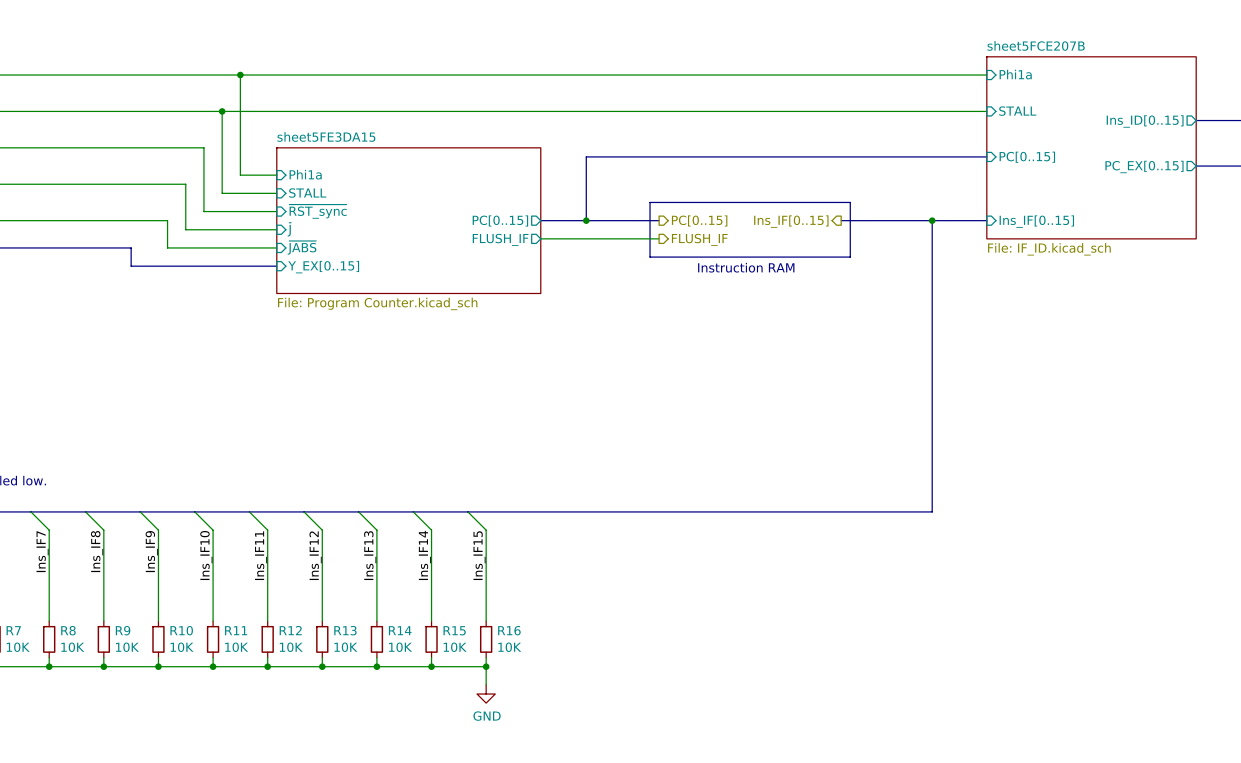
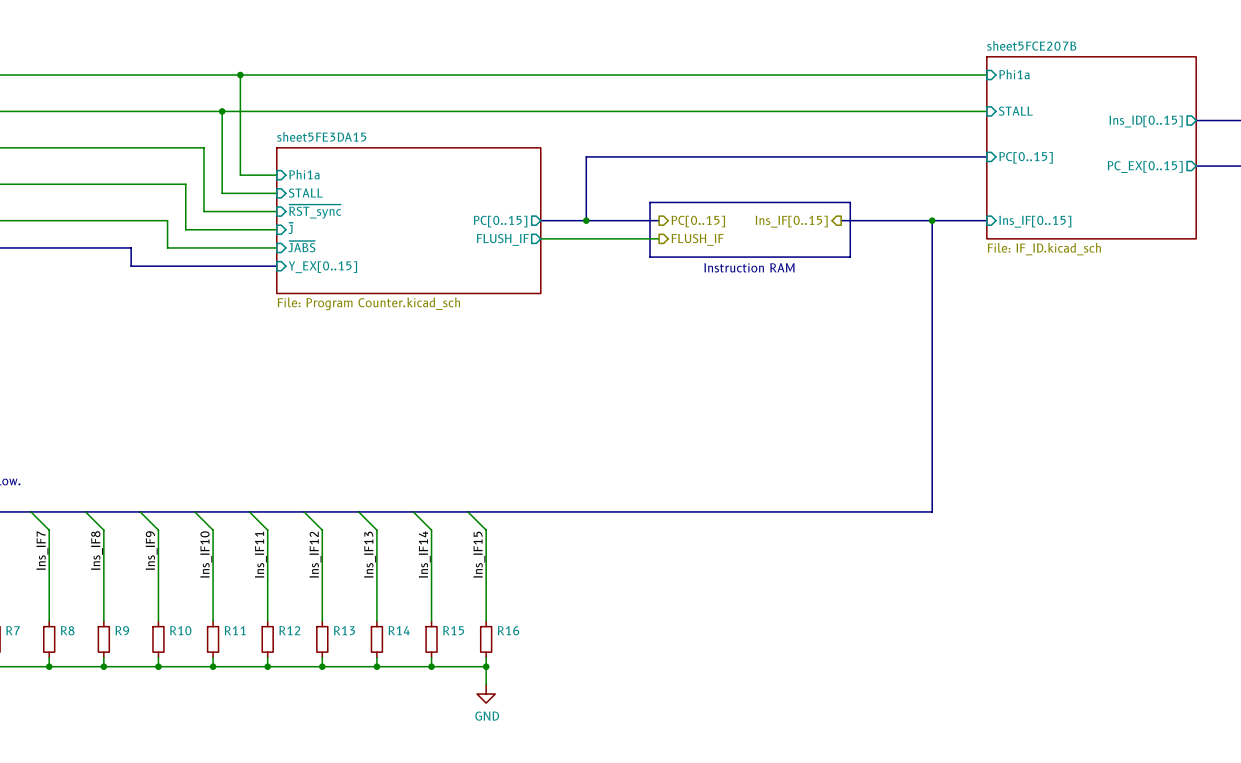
R7 value: 10K (18, 647) -> none
R8 value: 10K (72, 647) -> none
R9 value: 10K (127, 647) -> none
R10 value: 10K (182, 647) -> none
R11 value: 10K (236, 647) -> none
R12 value: 10K (291, 647) -> none
R13 value: 10K (345, 647) -> none
R14 value: 10K (400, 647) -> none
R15 value: 10K (455, 647) -> none
R16 value: 10K (509, 647) -> none

